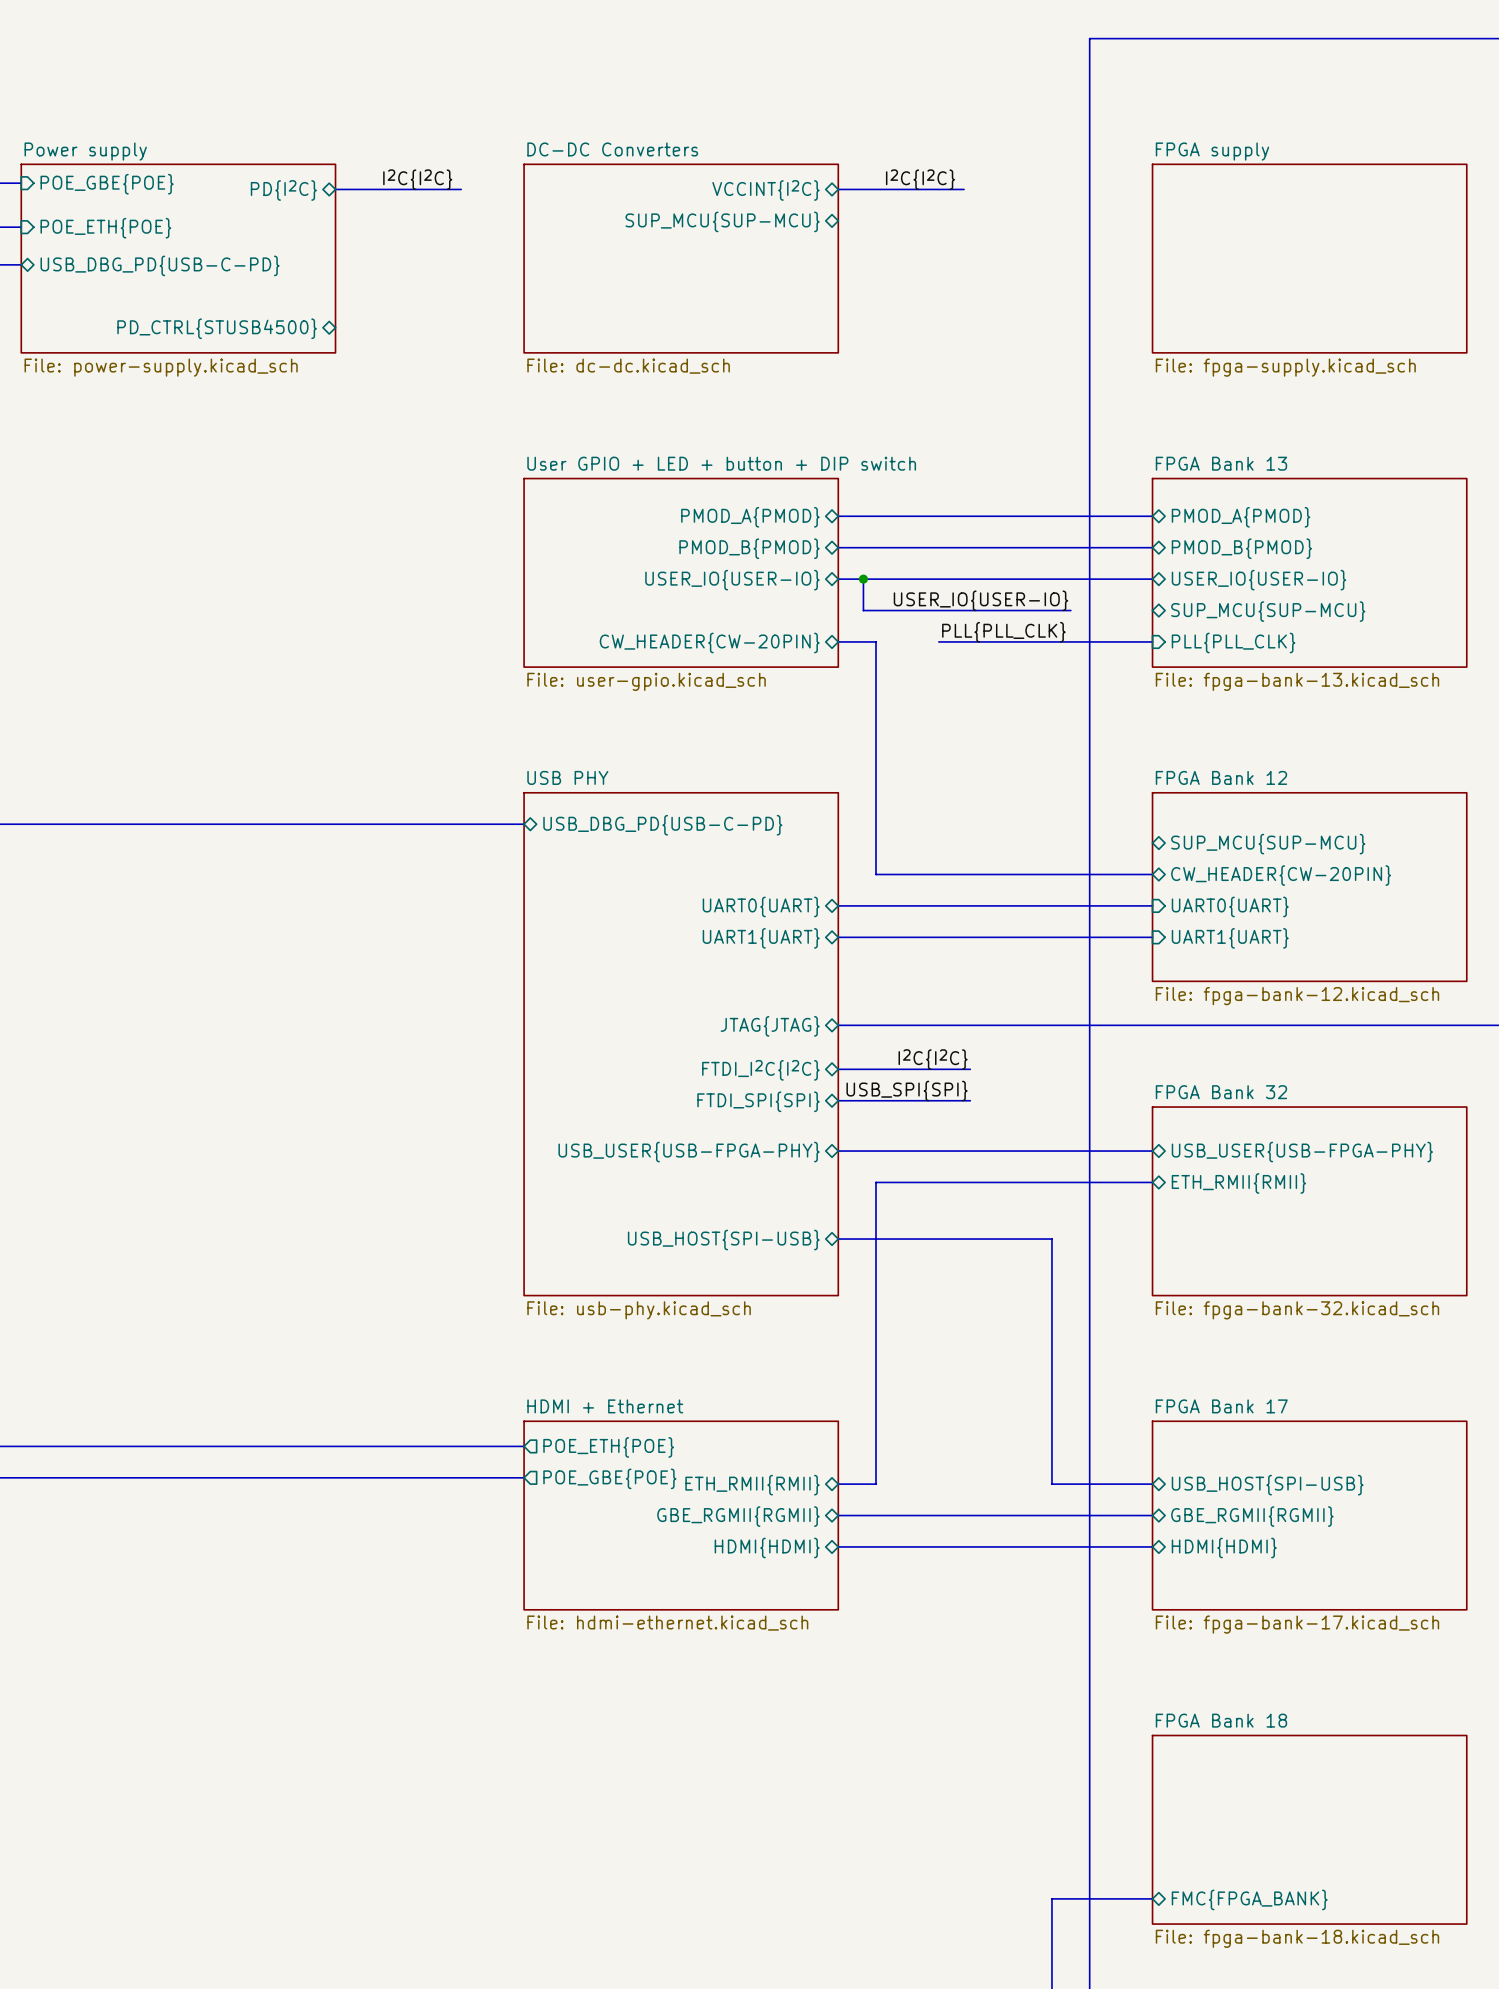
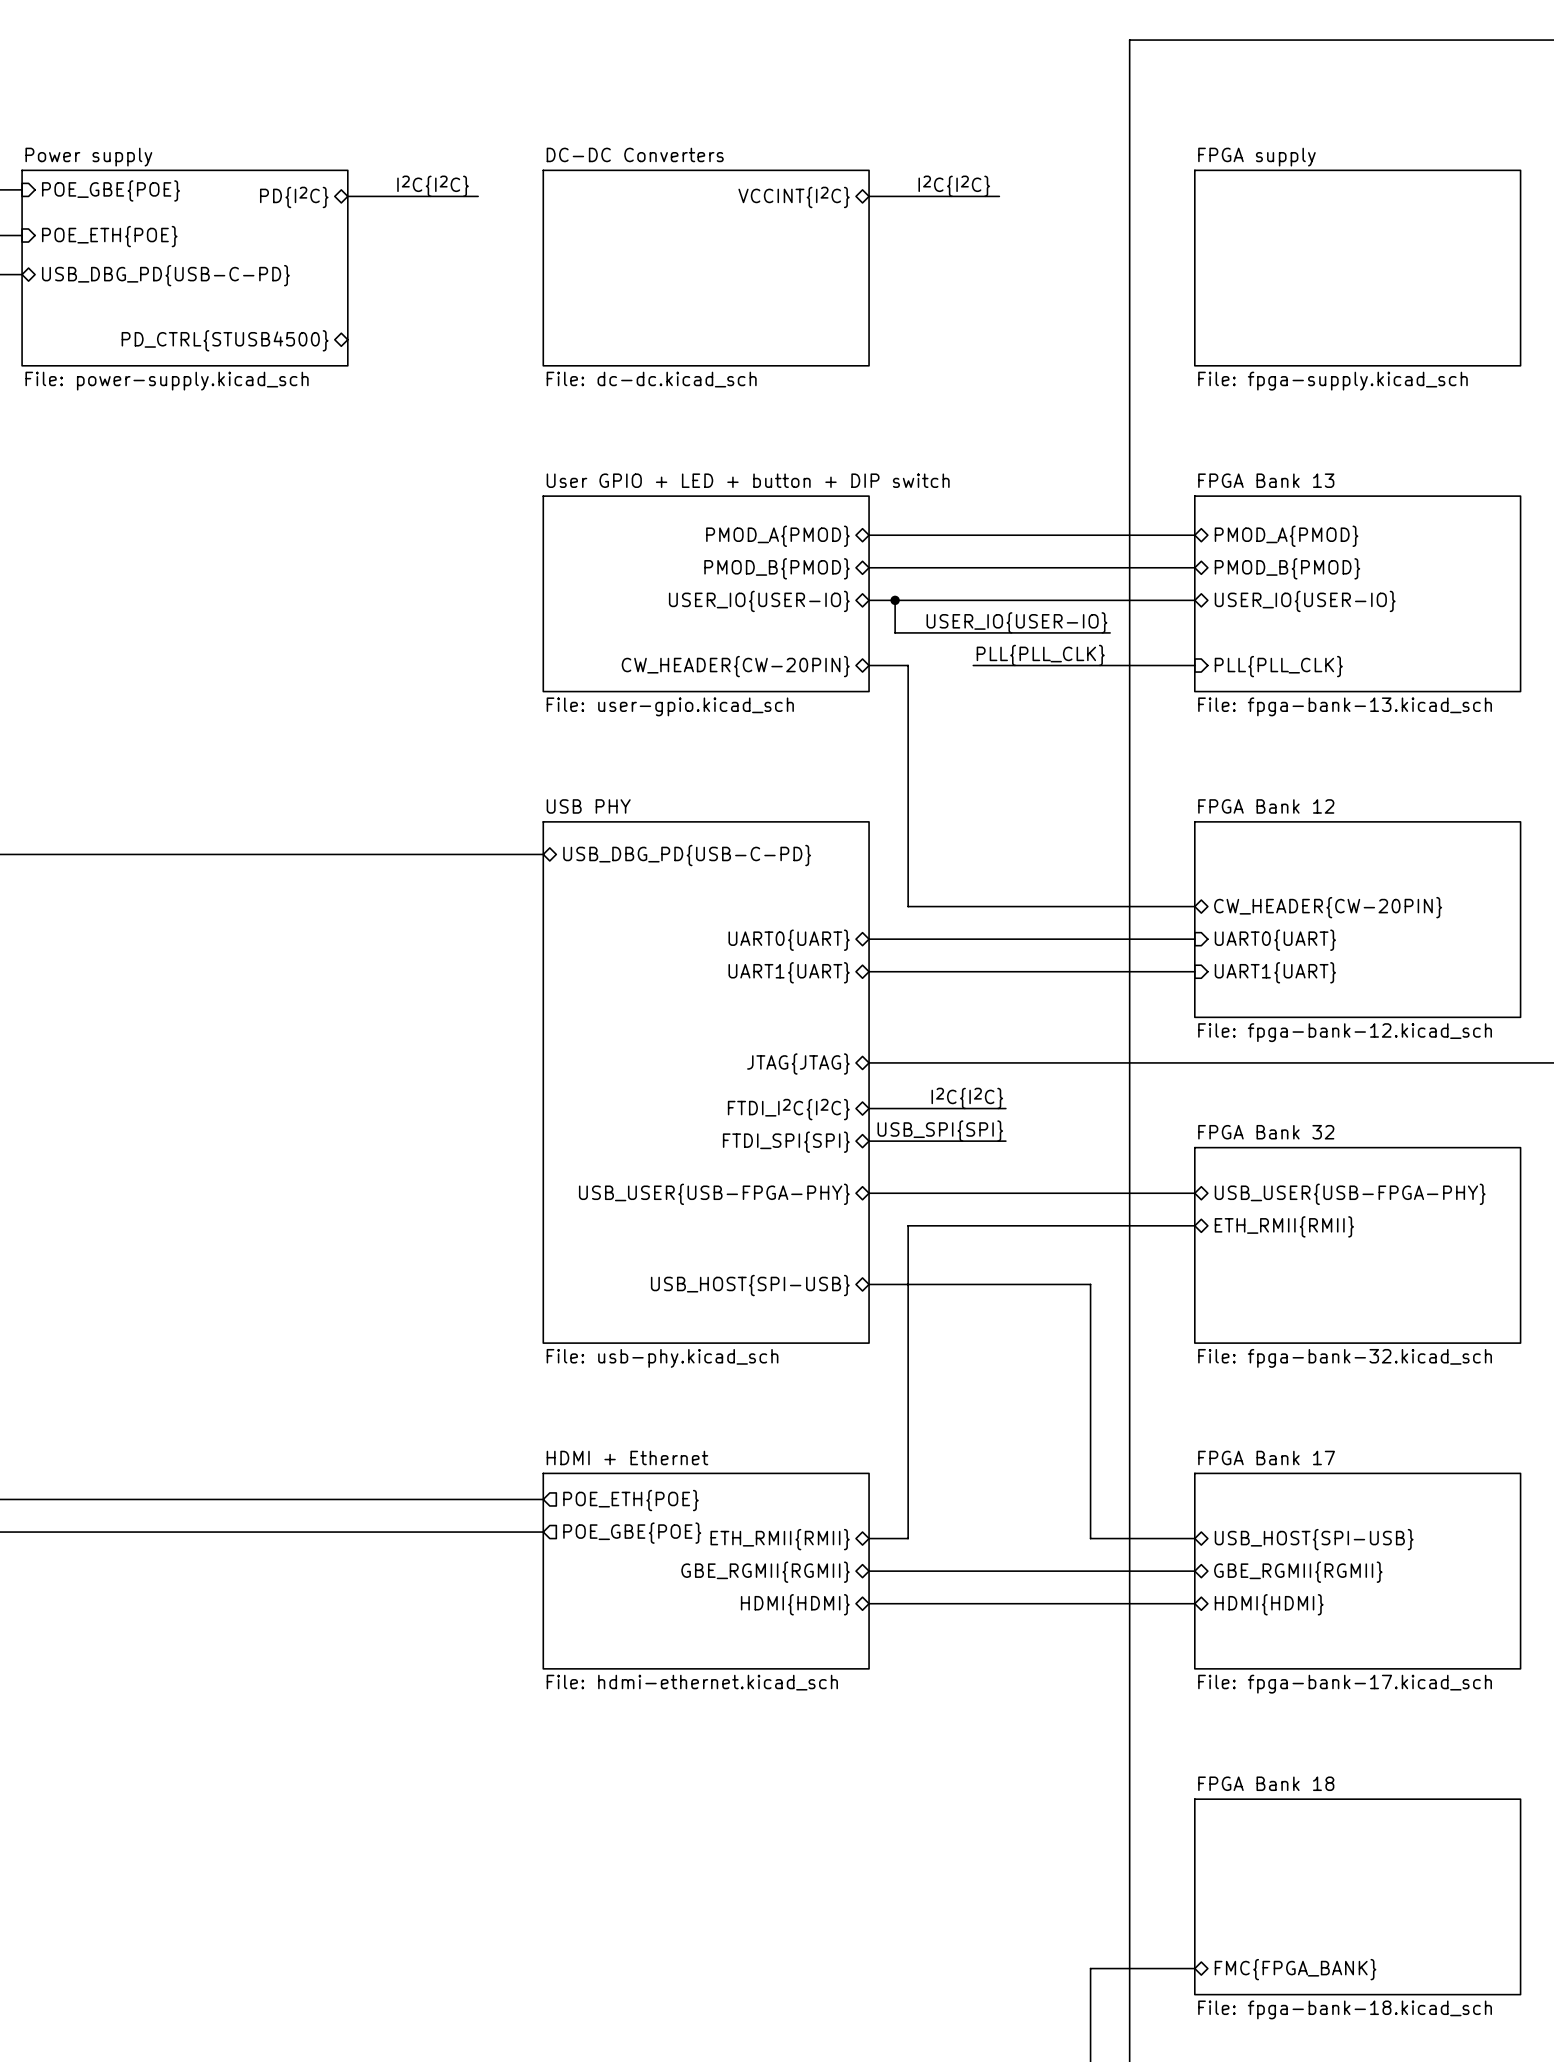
sheet pin: SUP_MCU{SUP-MCU} (722, 221) -> none
sheet pin: SUP_MCU{SUP-MCU} (1268, 611) -> none
sheet pin: SUP_MCU{SUP-MCU} (1268, 844) -> none

